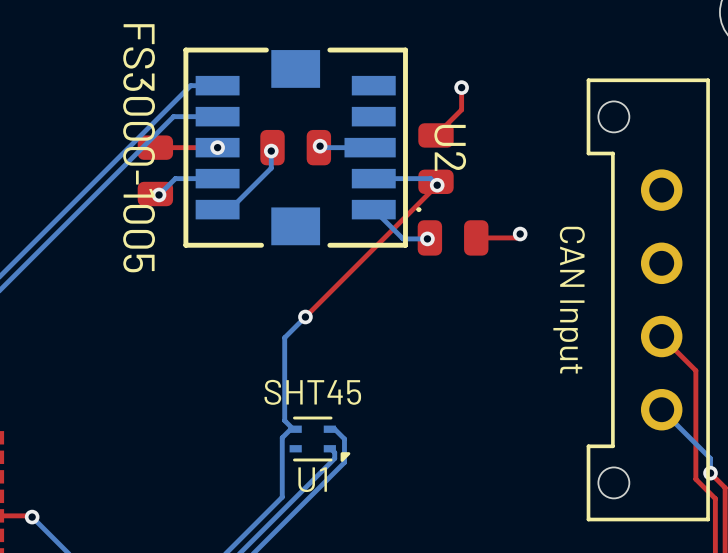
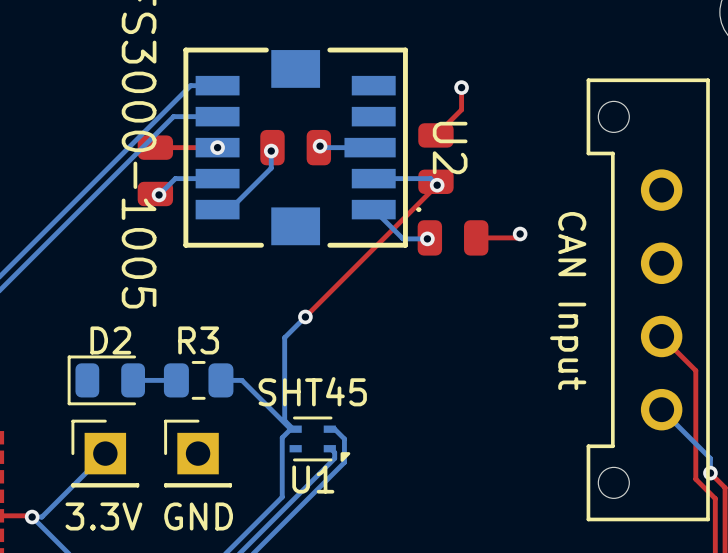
D2: none -> (106, 380)
bottom track: none -> (176, 380) (133, 380)
R3: none -> (198, 380)
bottom track: none -> (220, 380) (241, 380) (290, 429)
bottom track: none -> (105, 453) (41, 517) (32, 517)
part: none -> (105, 453)
part: none -> (198, 453)
text: none -> 3.3V (103, 516)
text: none -> GND (198, 516)

